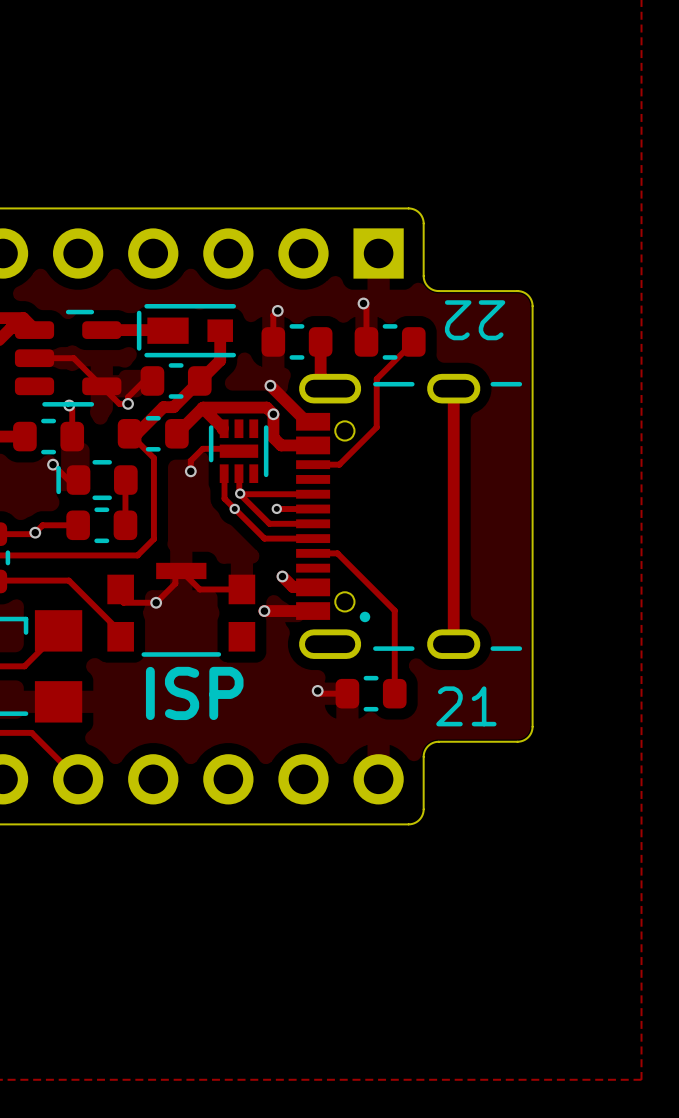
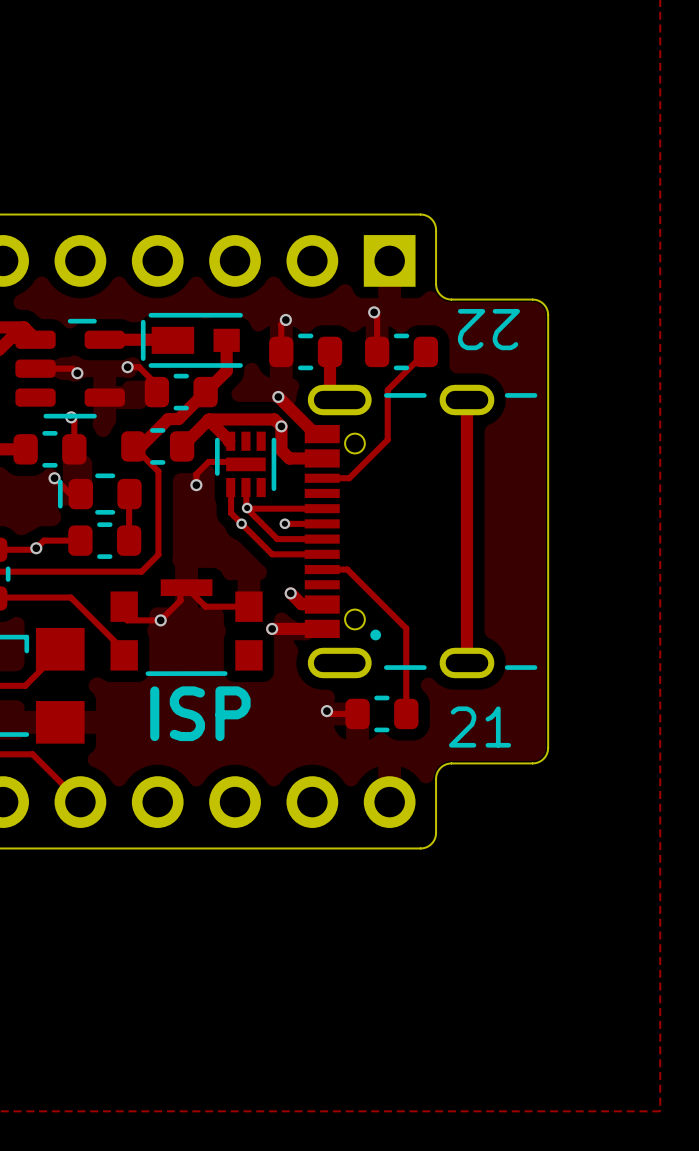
via: none -> (127, 367)
track: (70, 358) (73, 358) (119, 403) (128, 403) (128, 397) (144, 380) (152, 380) -> (127, 367) (139, 367) (156, 384) (156, 392)
via: none -> (77, 373)
via: (128, 403) -> none

